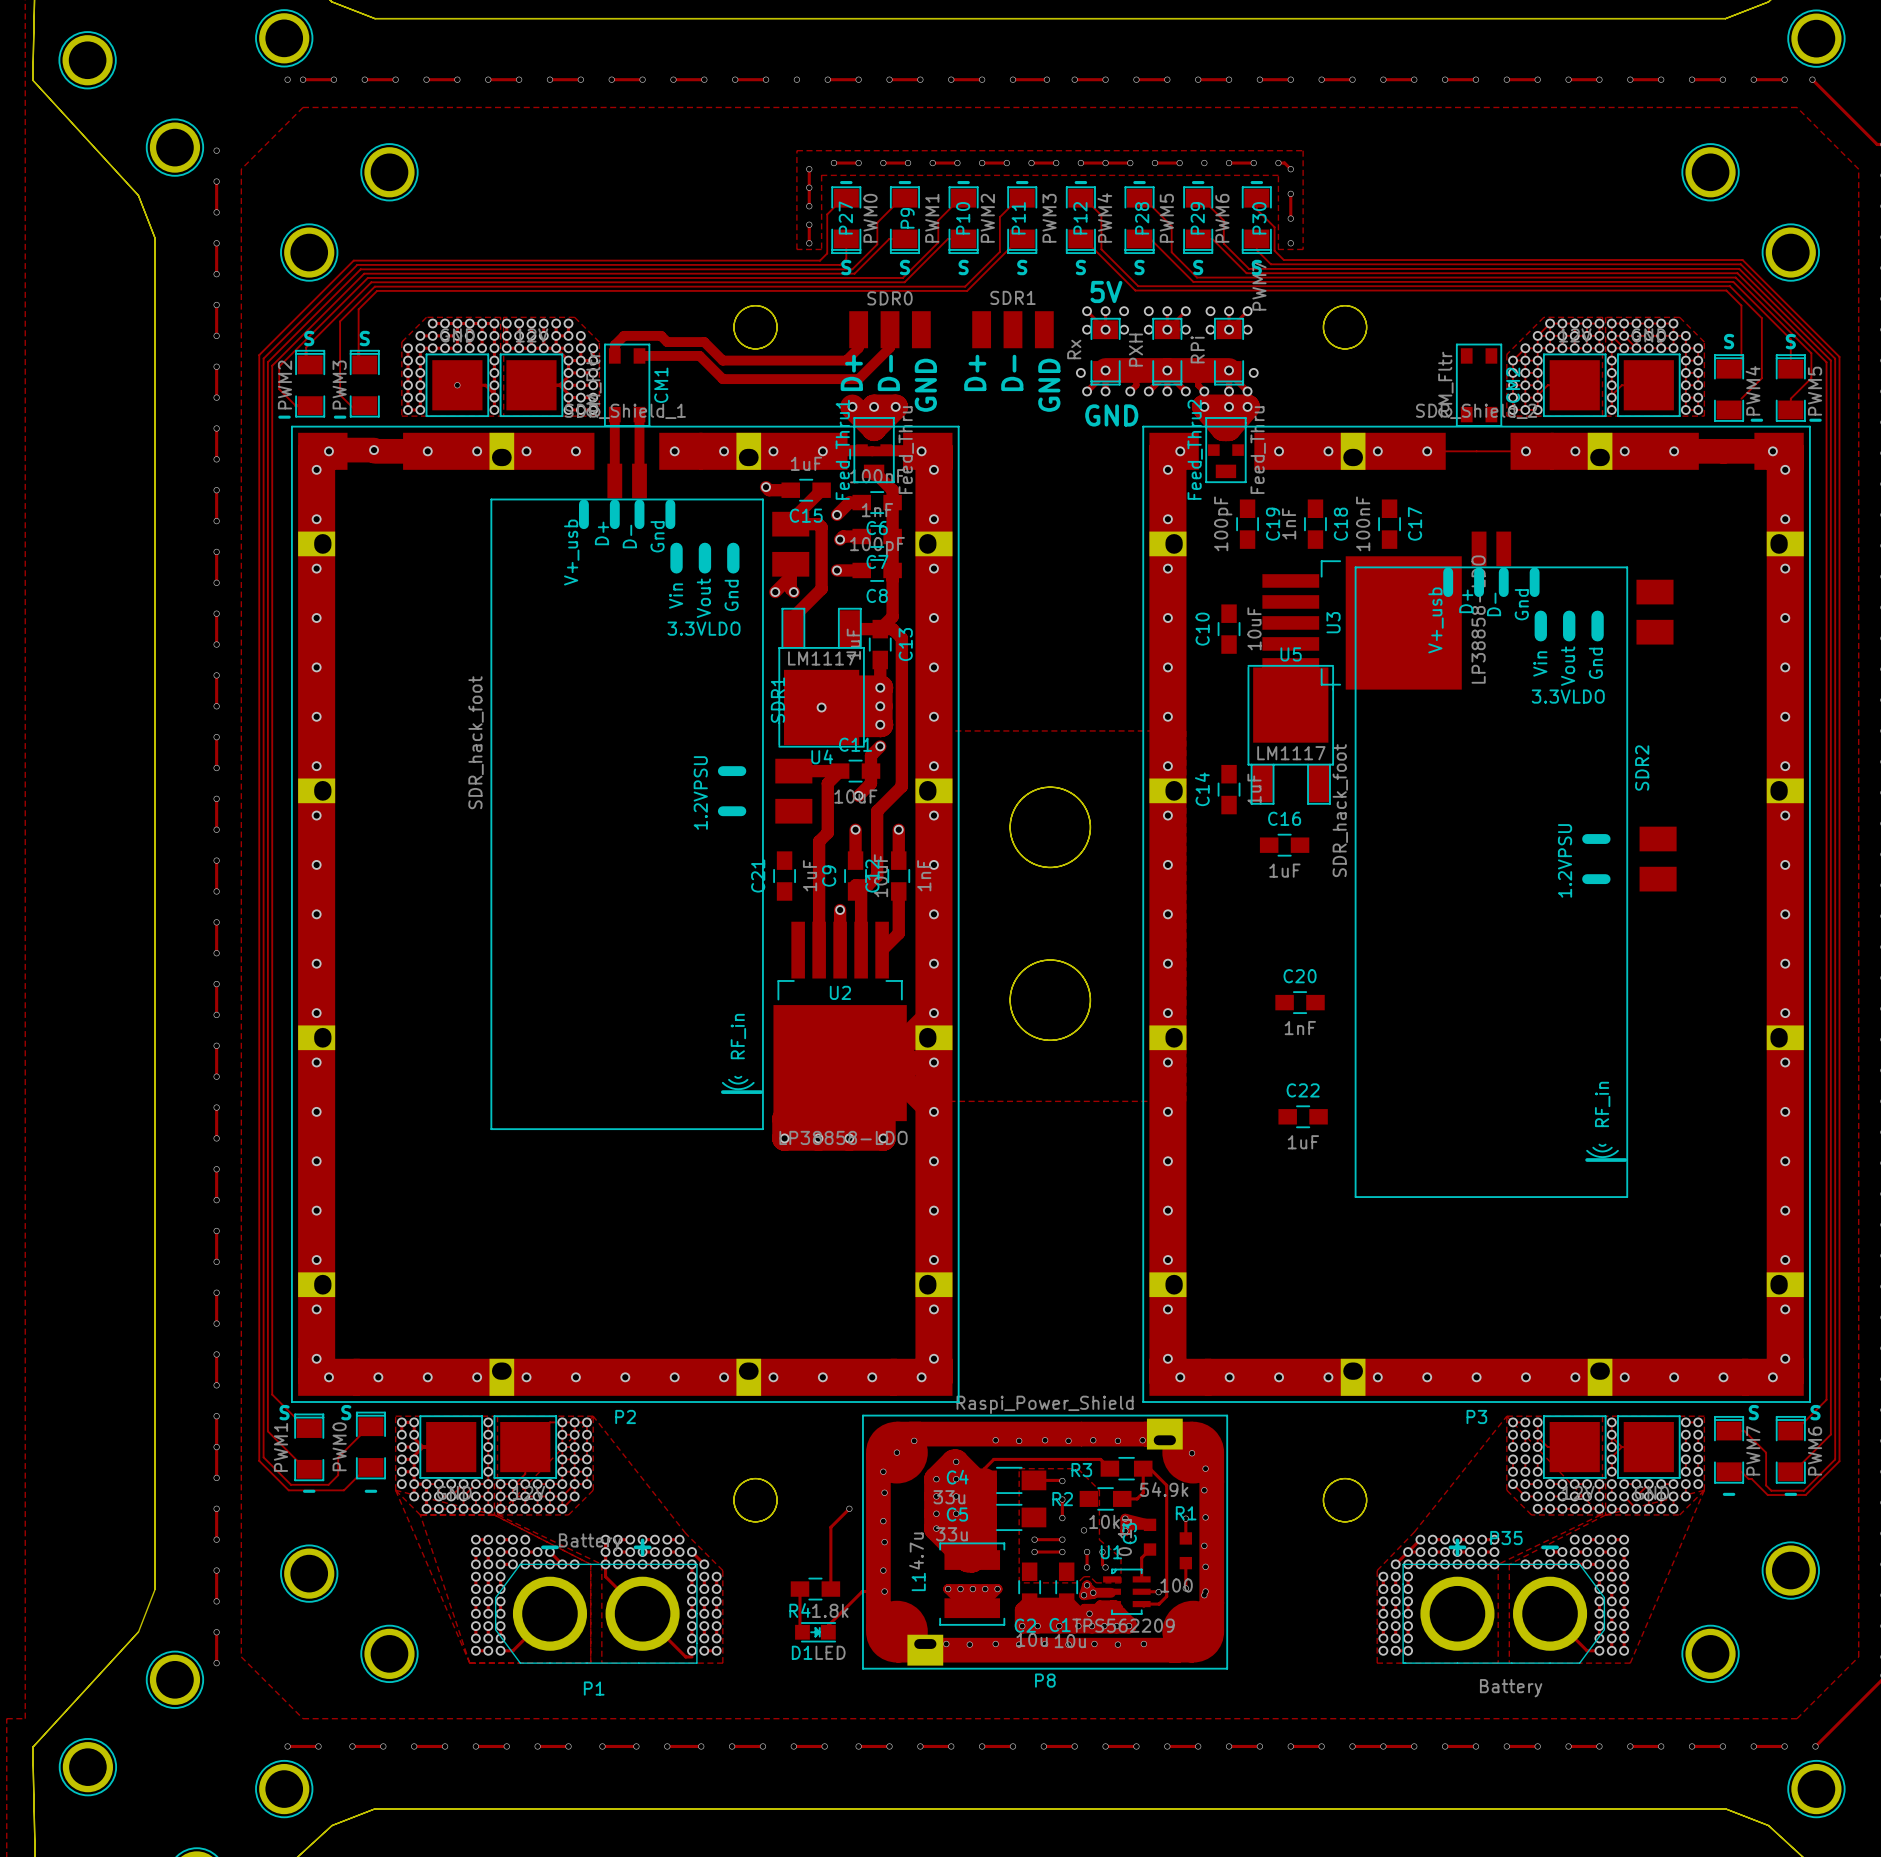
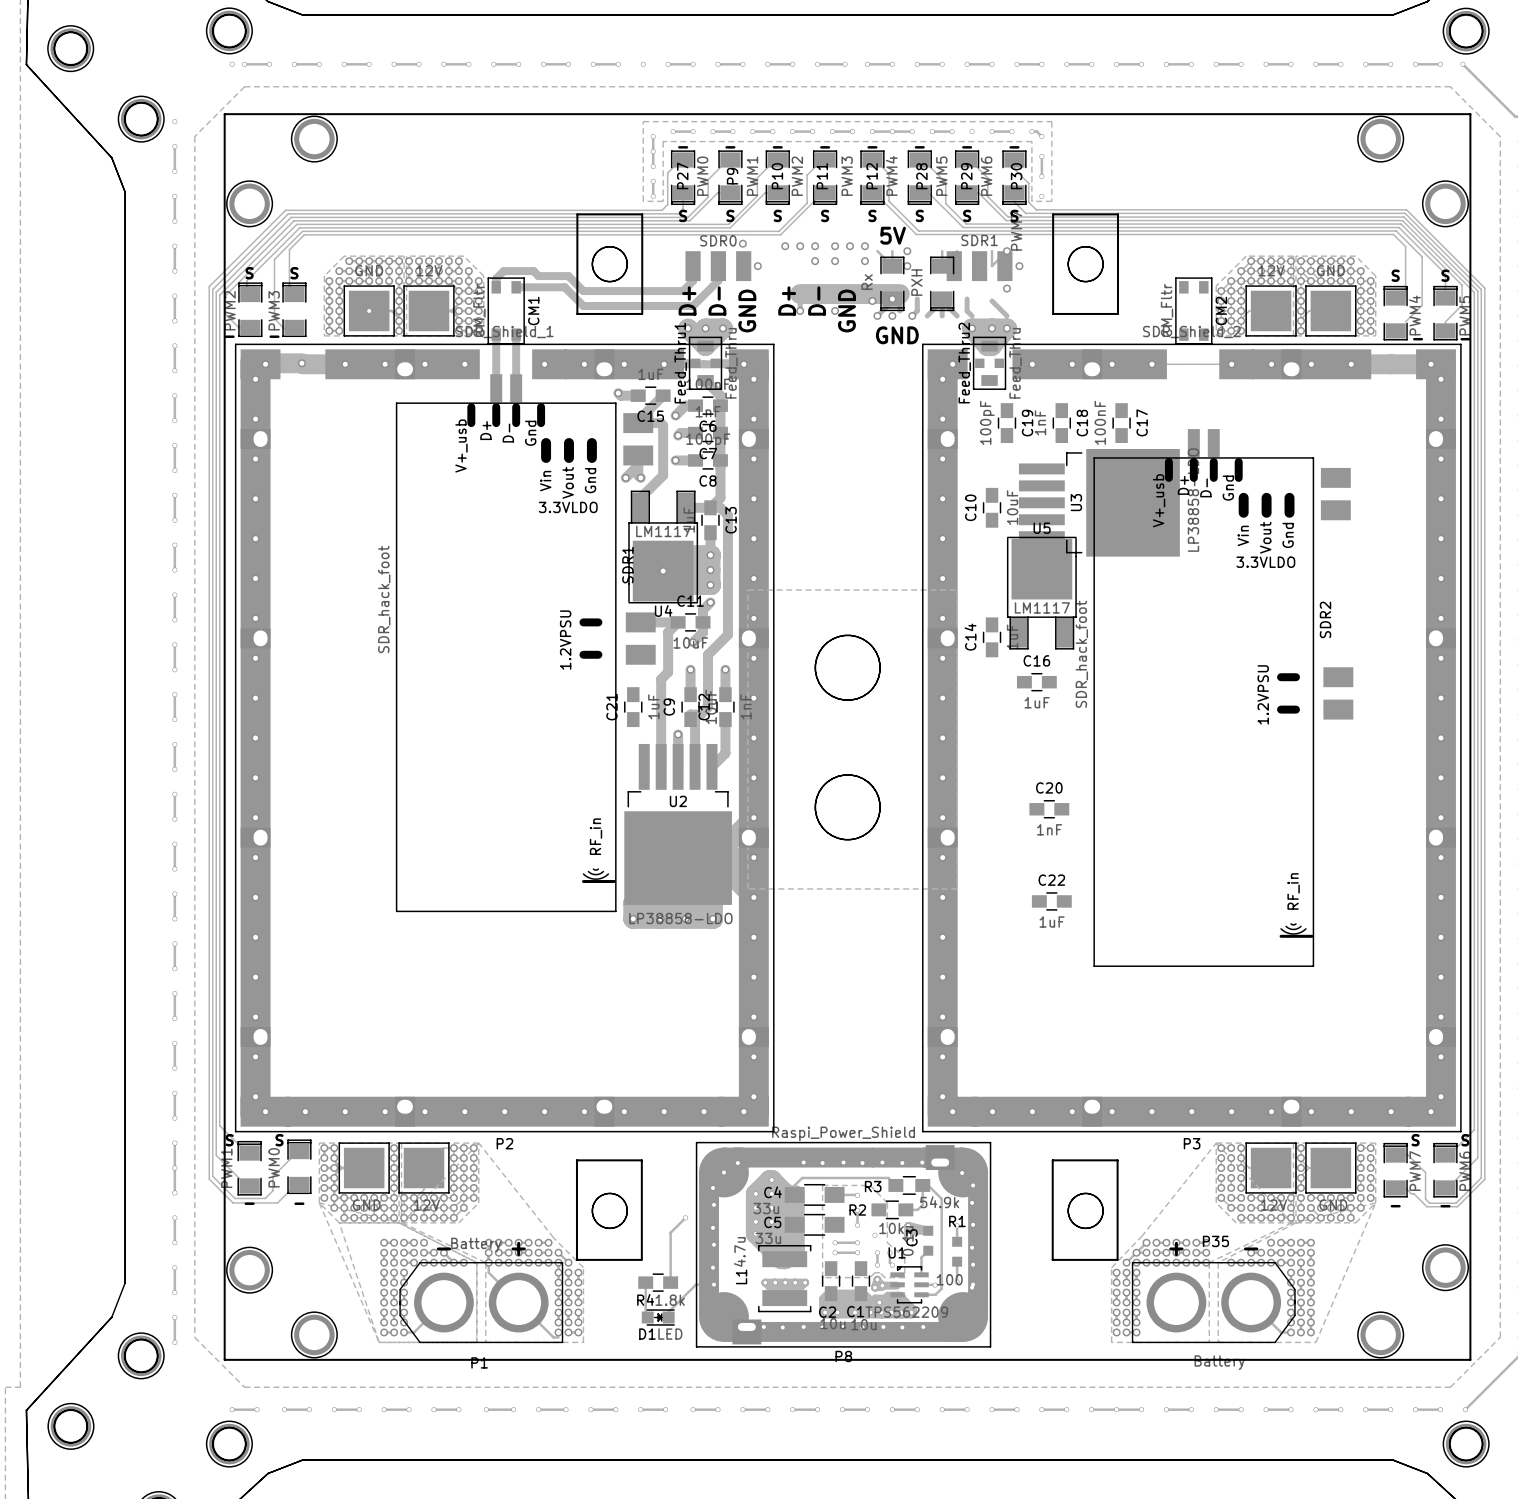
line: none -> (224, 114) (224, 1359) (1470, 1359) (1470, 114) (224, 114)
line: none -> (577, 214) (577, 314)
line: none -> (577, 214) (642, 214) (642, 313)
line: none -> (1053, 214) (1053, 314)
line: none -> (1053, 214) (1117, 214) (1118, 313)
via: none -> (742, 243)
via: none -> (785, 246)
via: none -> (800, 246)
via: none -> (815, 246)
via: none -> (835, 246)
via: none -> (850, 246)
via: none -> (864, 246)
via: (1087, 311) -> none
via: (1105, 311) -> none
via: (1148, 311) -> none
via: (1167, 311) -> none
via: (1185, 311) -> none
via: (1210, 311) -> none
via: (1229, 311) -> none
via: none -> (815, 261)
via: none -> (835, 261)
via: none -> (864, 261)
via: none -> (757, 266)
part position: (1012, 329) -> (979, 266)
via: (1087, 329) -> none
via: (1105, 329) -> none
via: (1148, 329) -> none
via: (1167, 329) -> none
via: (1185, 329) -> none
via: (1210, 329) -> none
via: (1229, 329) -> none
via: (1247, 329) -> none
via: none -> (1019, 266)
part: RPi (1229, 351) -> none
via: none -> (1006, 288)
via: (1167, 370) -> none
via: (1229, 370) -> none
via: (1253, 372) -> none
via: none -> (800, 310)
via: none -> (835, 310)
line: none -> (577, 313) (642, 313)
line: none -> (1053, 313) (1118, 313)
track: (1105, 391) (1105, 370) (1229, 370) (1229, 391) -> (800, 310) (800, 294) (899, 294) (899, 310)
via: (1148, 391) -> none
via: (1167, 391) -> none
via: (1185, 391) -> none
via: (1204, 391) -> none
via: (1229, 391) -> none
via: (1247, 391) -> none
line: none -> (576, 1160) (576, 1259)
line: none -> (577, 1160) (641, 1160) (641, 1259)
line: none -> (1052, 1160) (1052, 1259)
line: none -> (1052, 1160) (1117, 1160) (1117, 1259)
line: none -> (576, 1259) (641, 1259)
line: none -> (1052, 1259) (1117, 1259)

